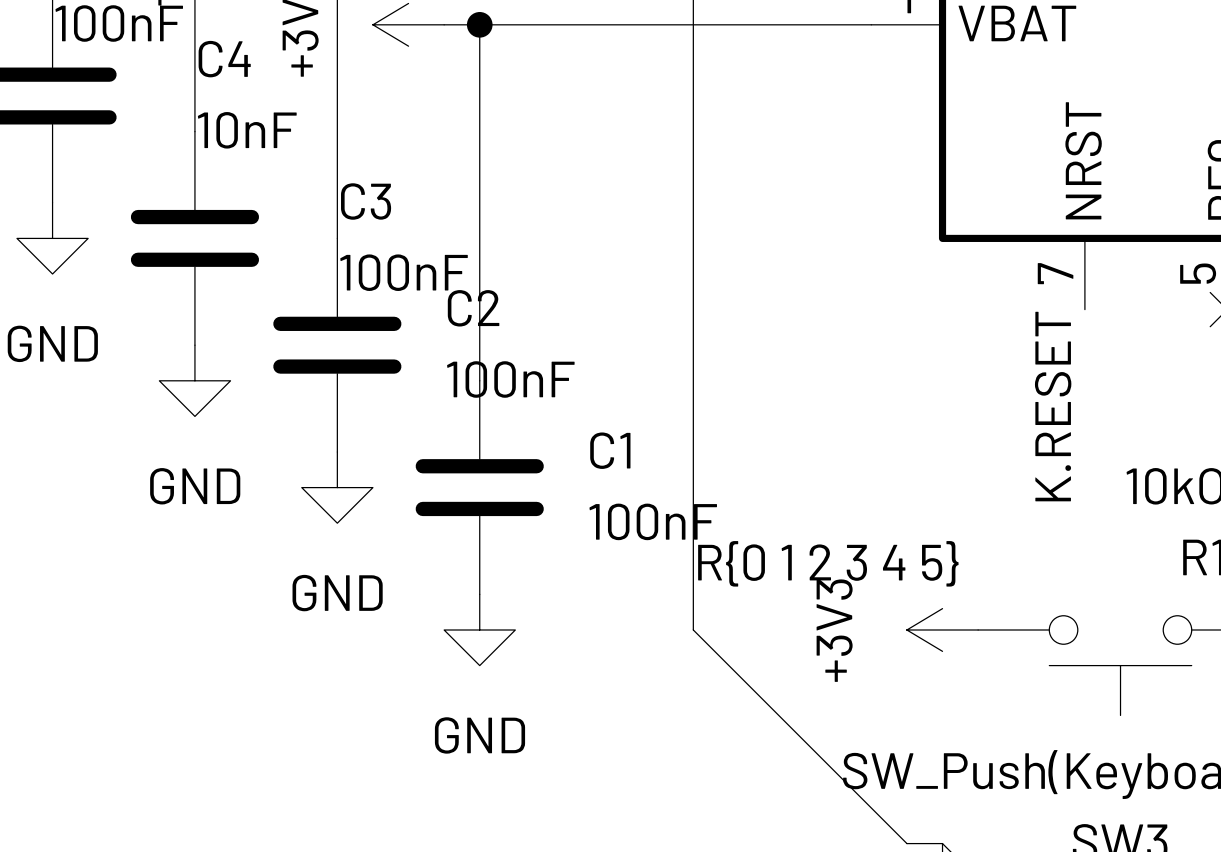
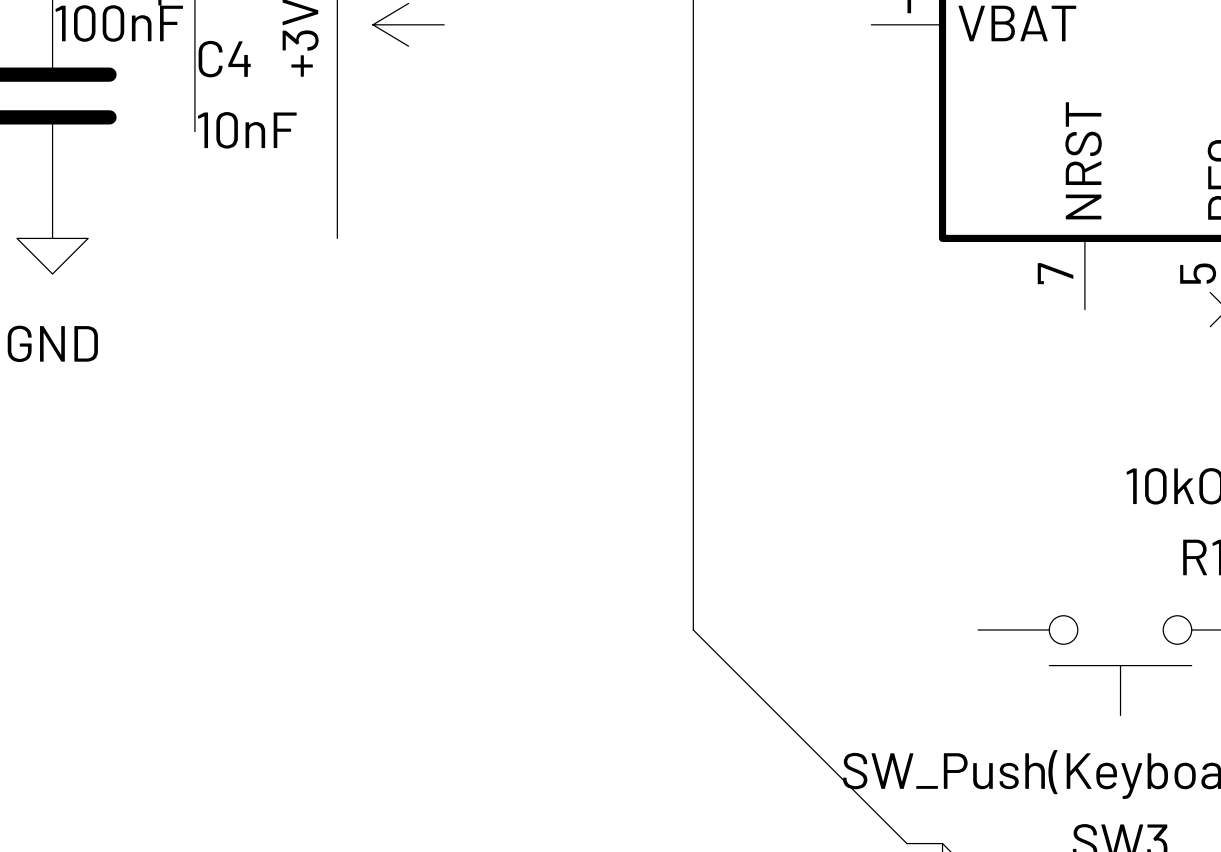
wire: (444, 24) (871, 24) -> none
wire: (479, 24) (479, 380) -> none
junction: (479, 24) -> none
C3: 100nF (194, 238) -> none
C2: 100nF (337, 345) -> none
power symbol: GND (194, 380) -> none
label: K.RESET (1053, 406) -> none
power symbol: GND (337, 487) -> none
C1: 100nF (479, 487) -> none
label: R{0 1 2 3 4 5} (828, 563) -> none
power symbol: GND (479, 629) -> none
power symbol: +3V3 (942, 629) -> none

